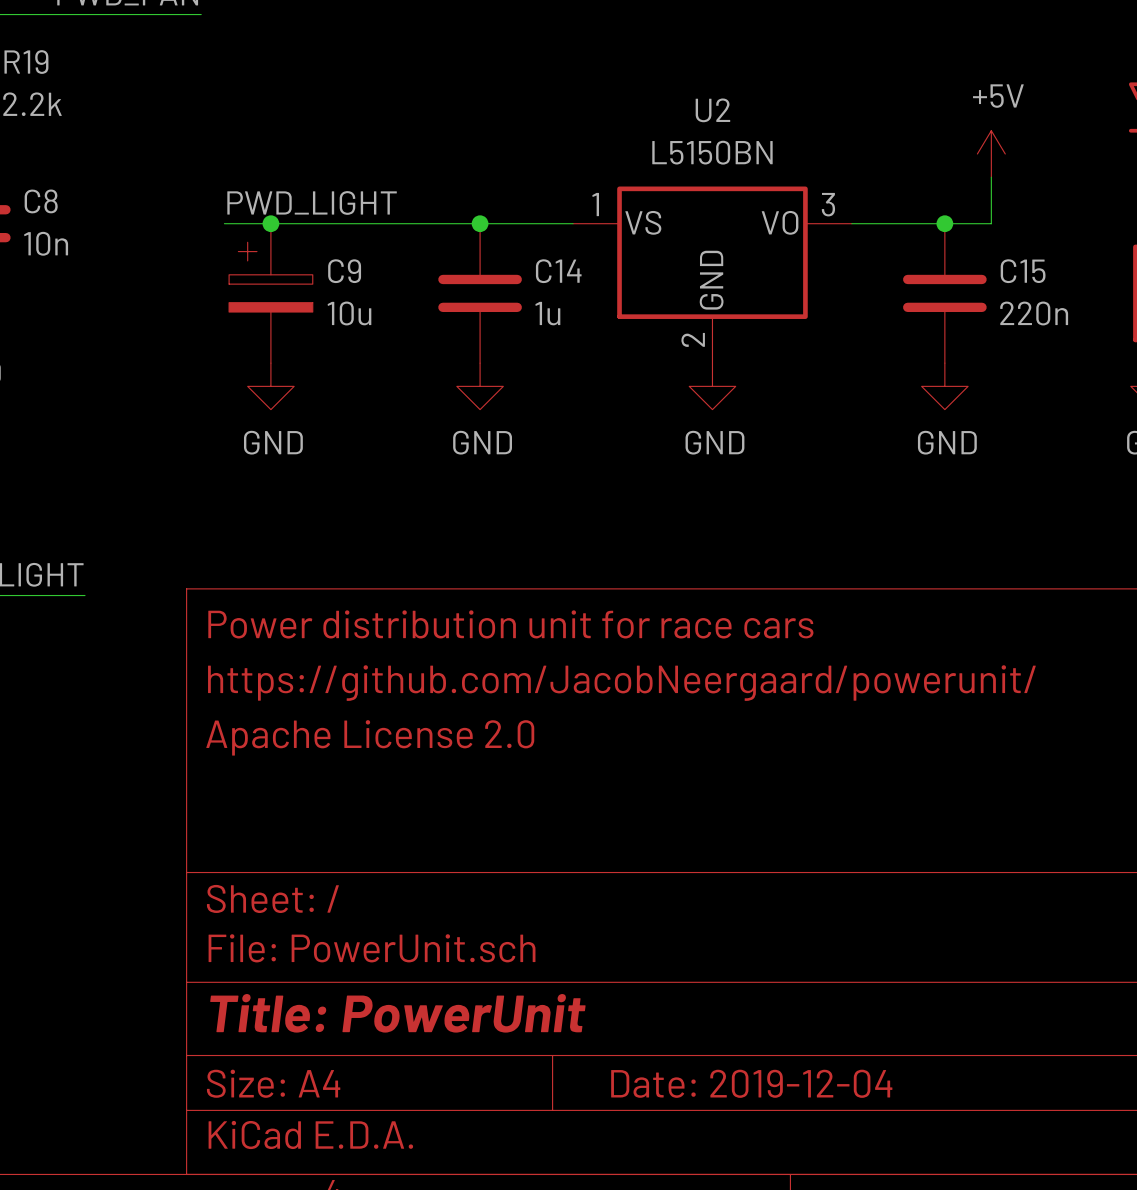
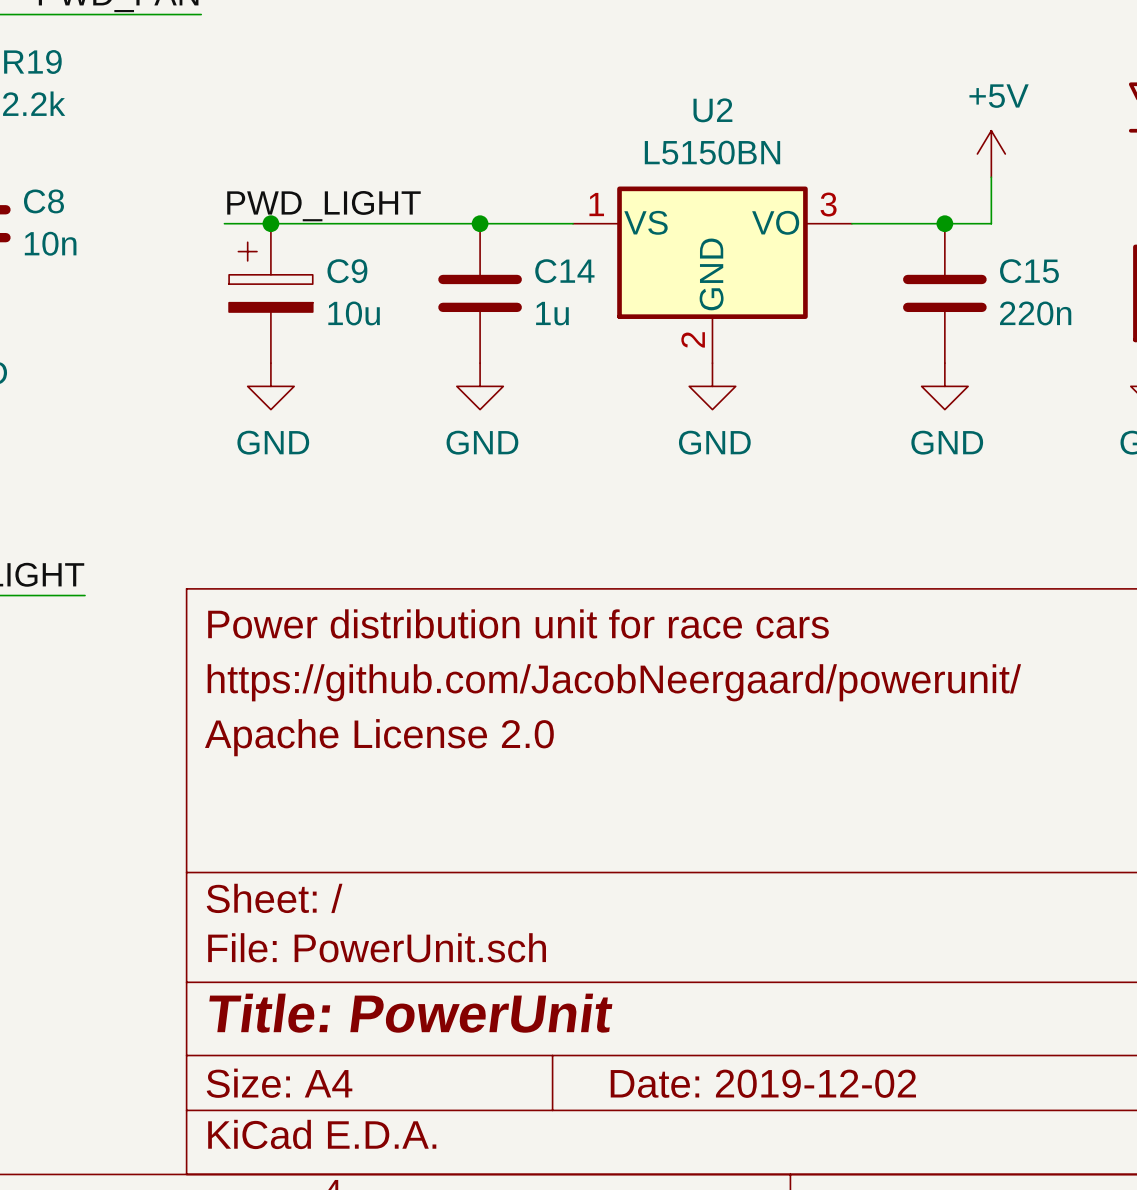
title block: Date: 2019-12-04 (751, 1083) -> Date: 2019-12-02 (763, 1083)

